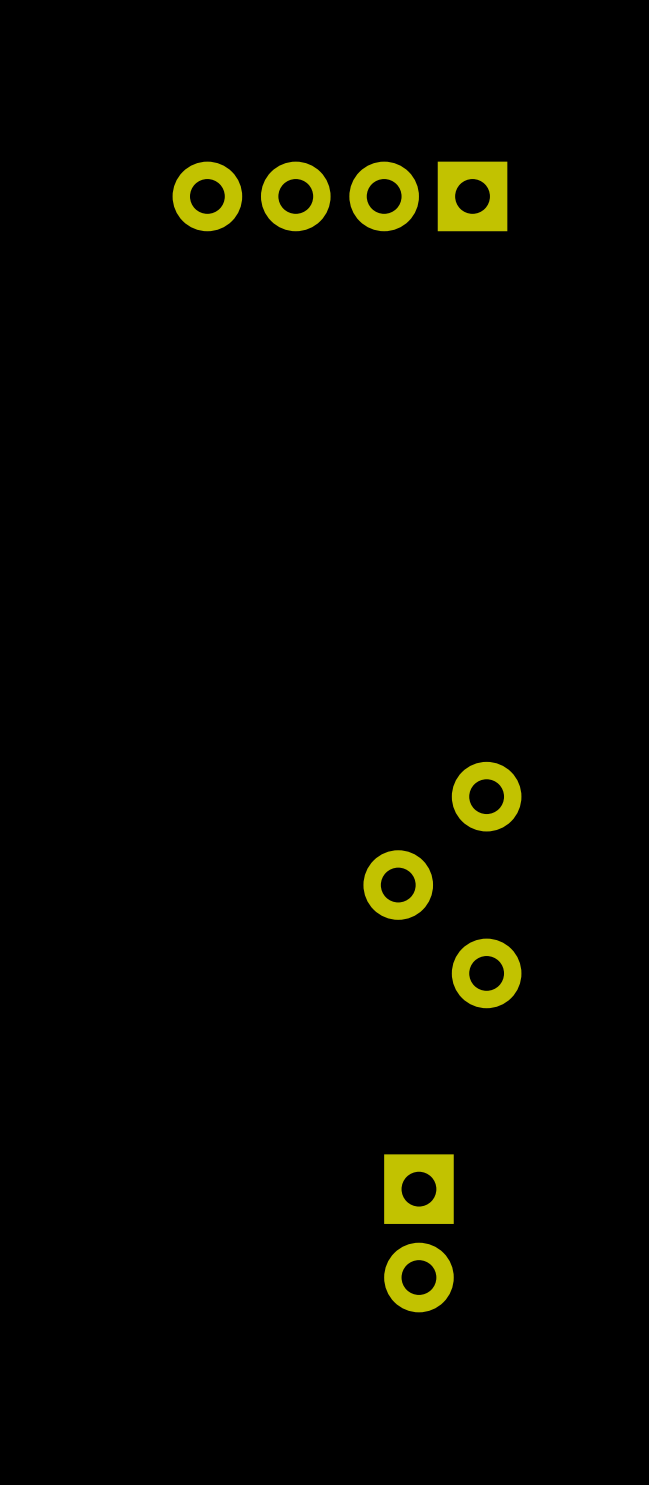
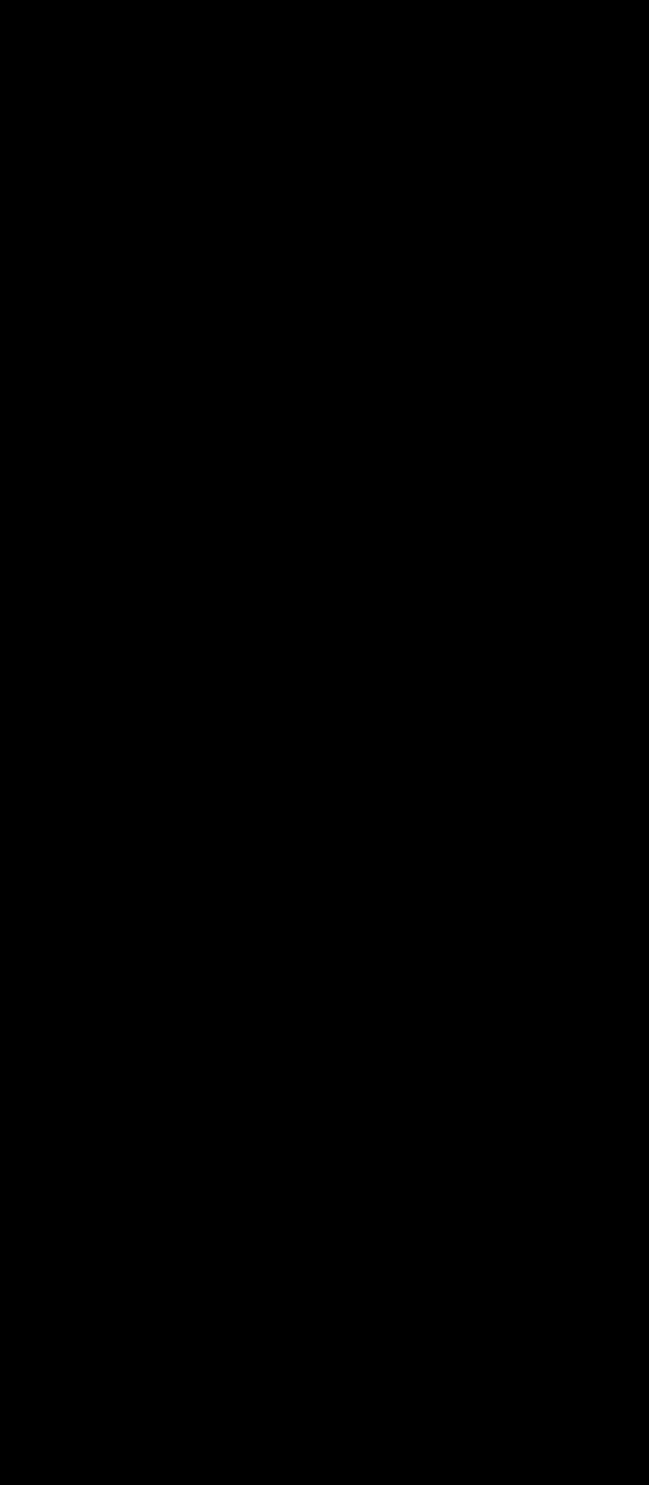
part: (339, 196) -> none
part: (442, 885) -> none
part: (418, 1233) -> none

